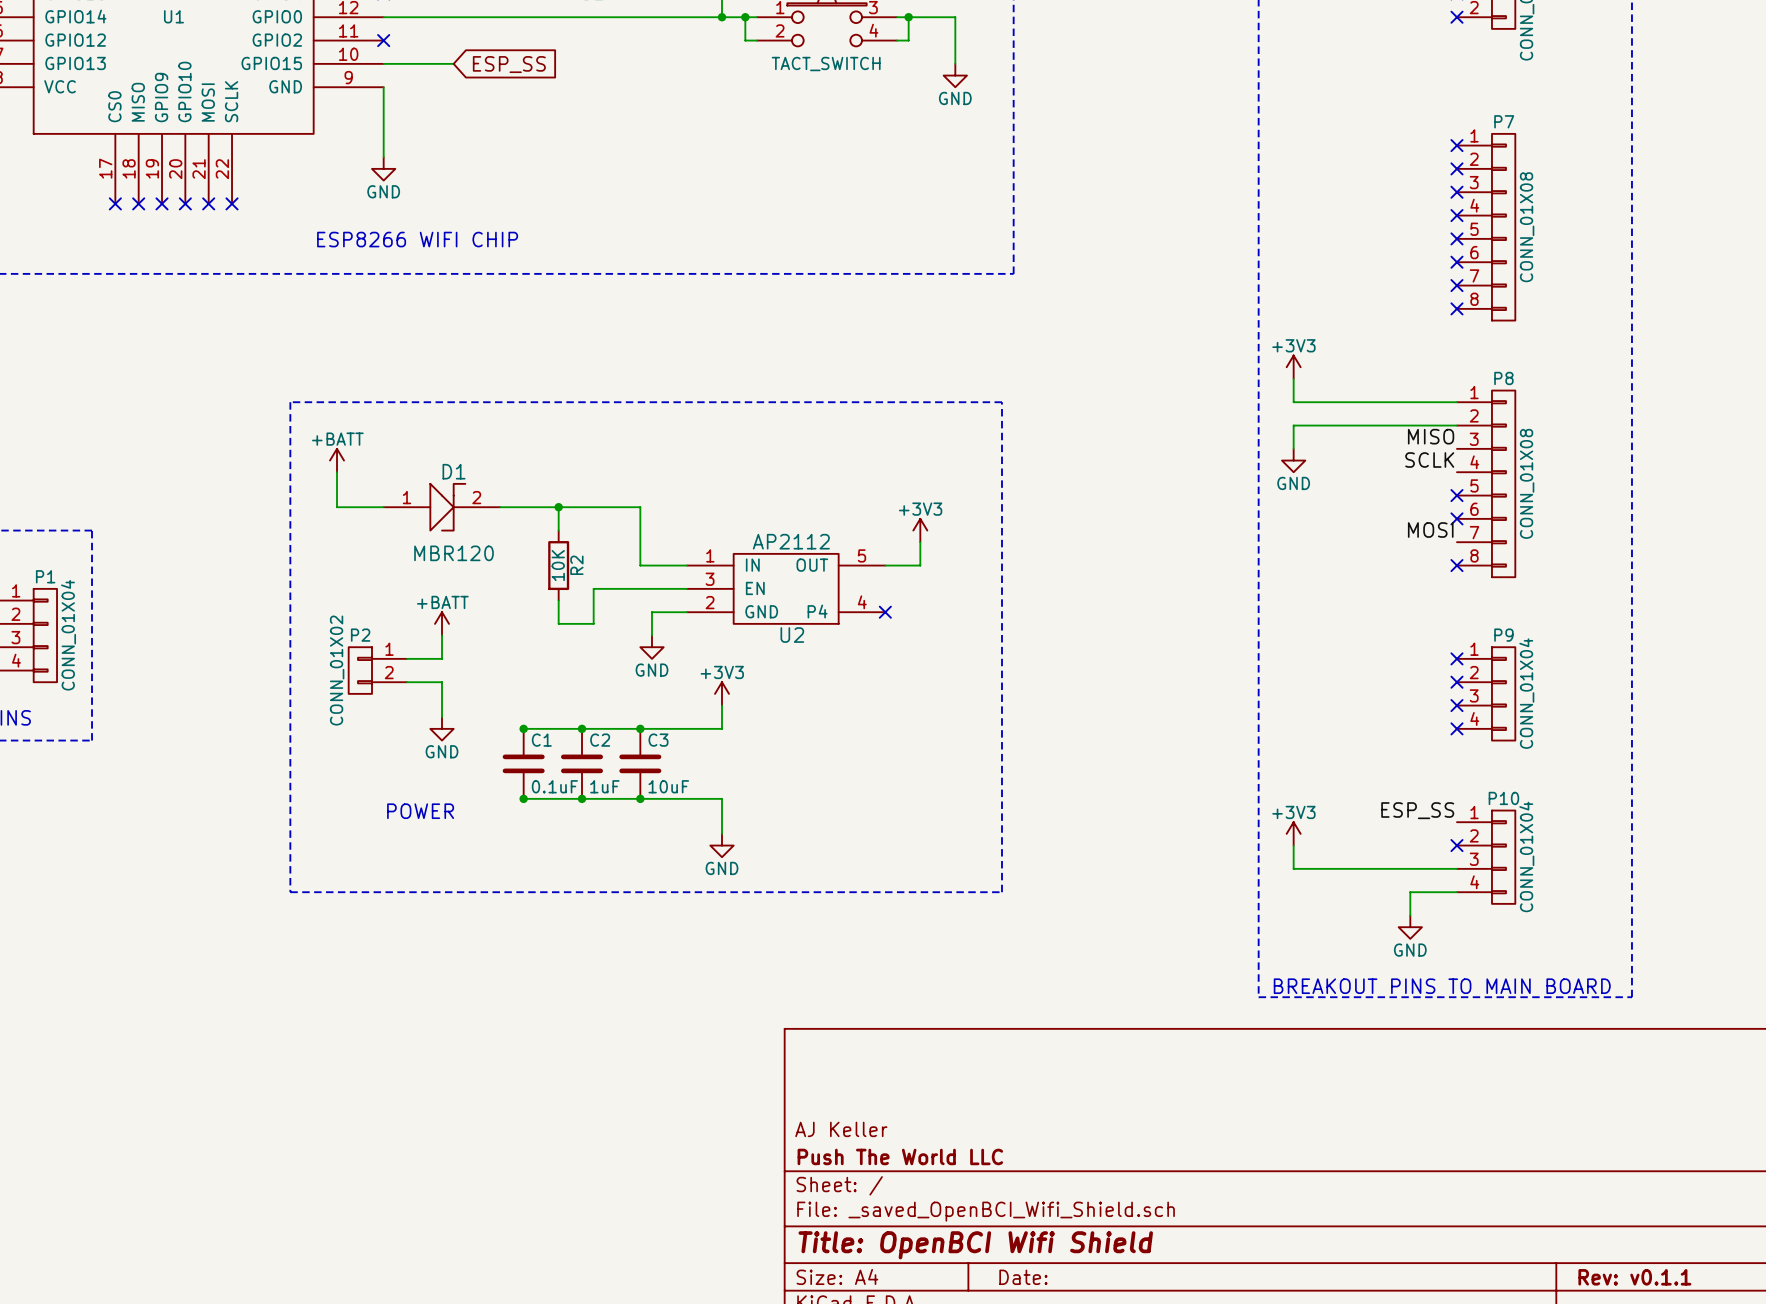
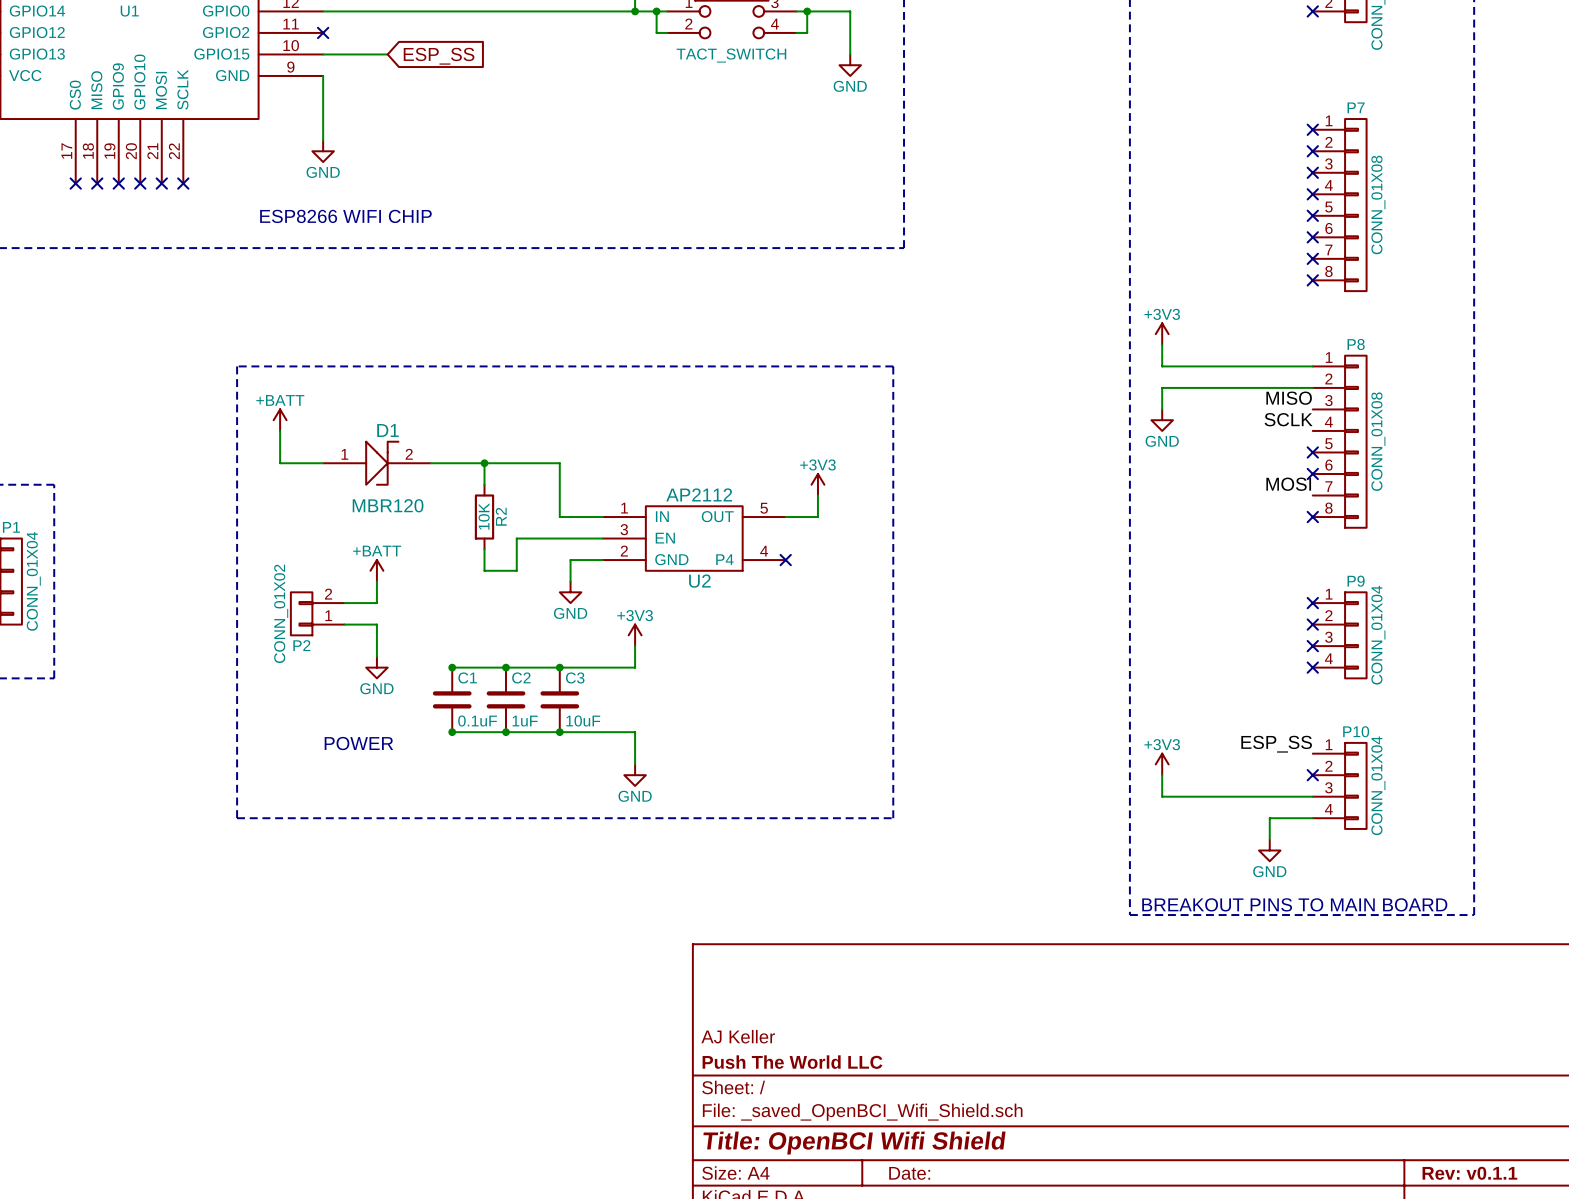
P2 flip: as is (360, 670) -> up-down (301, 613)

